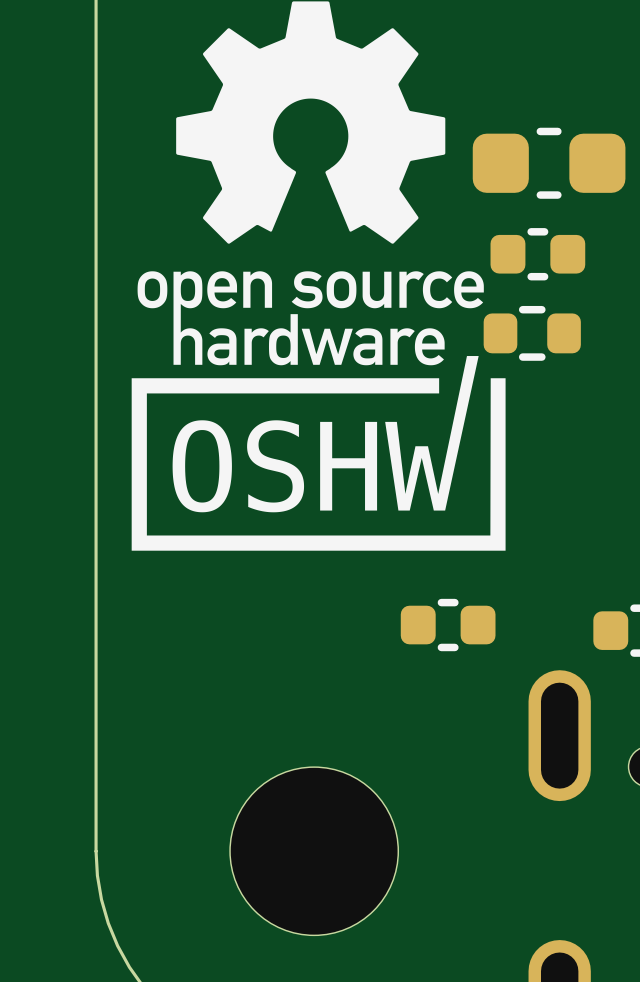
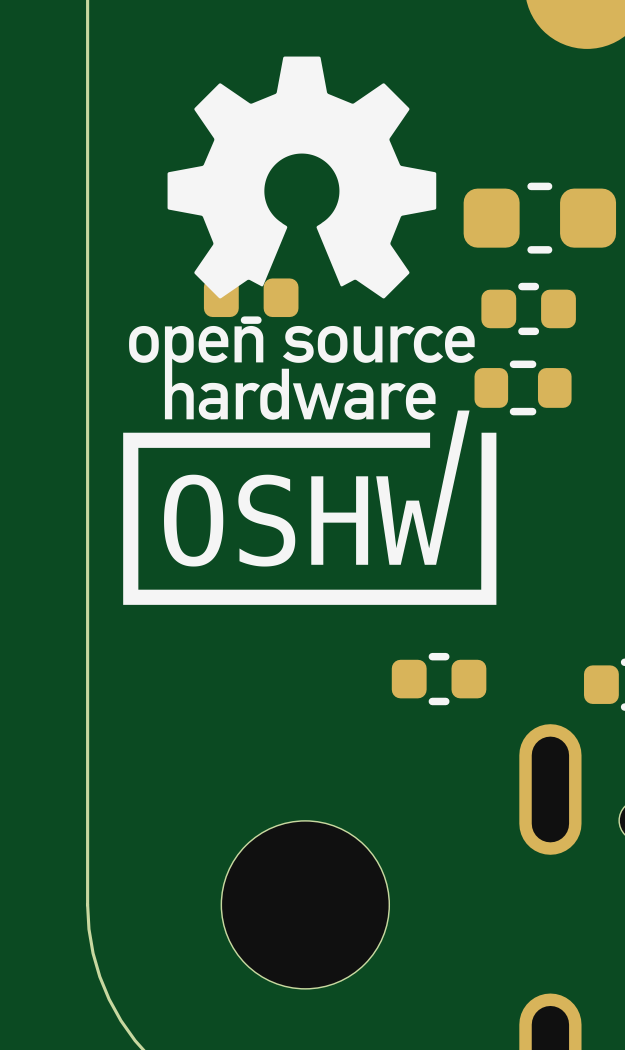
part: none -> (251, 297)

